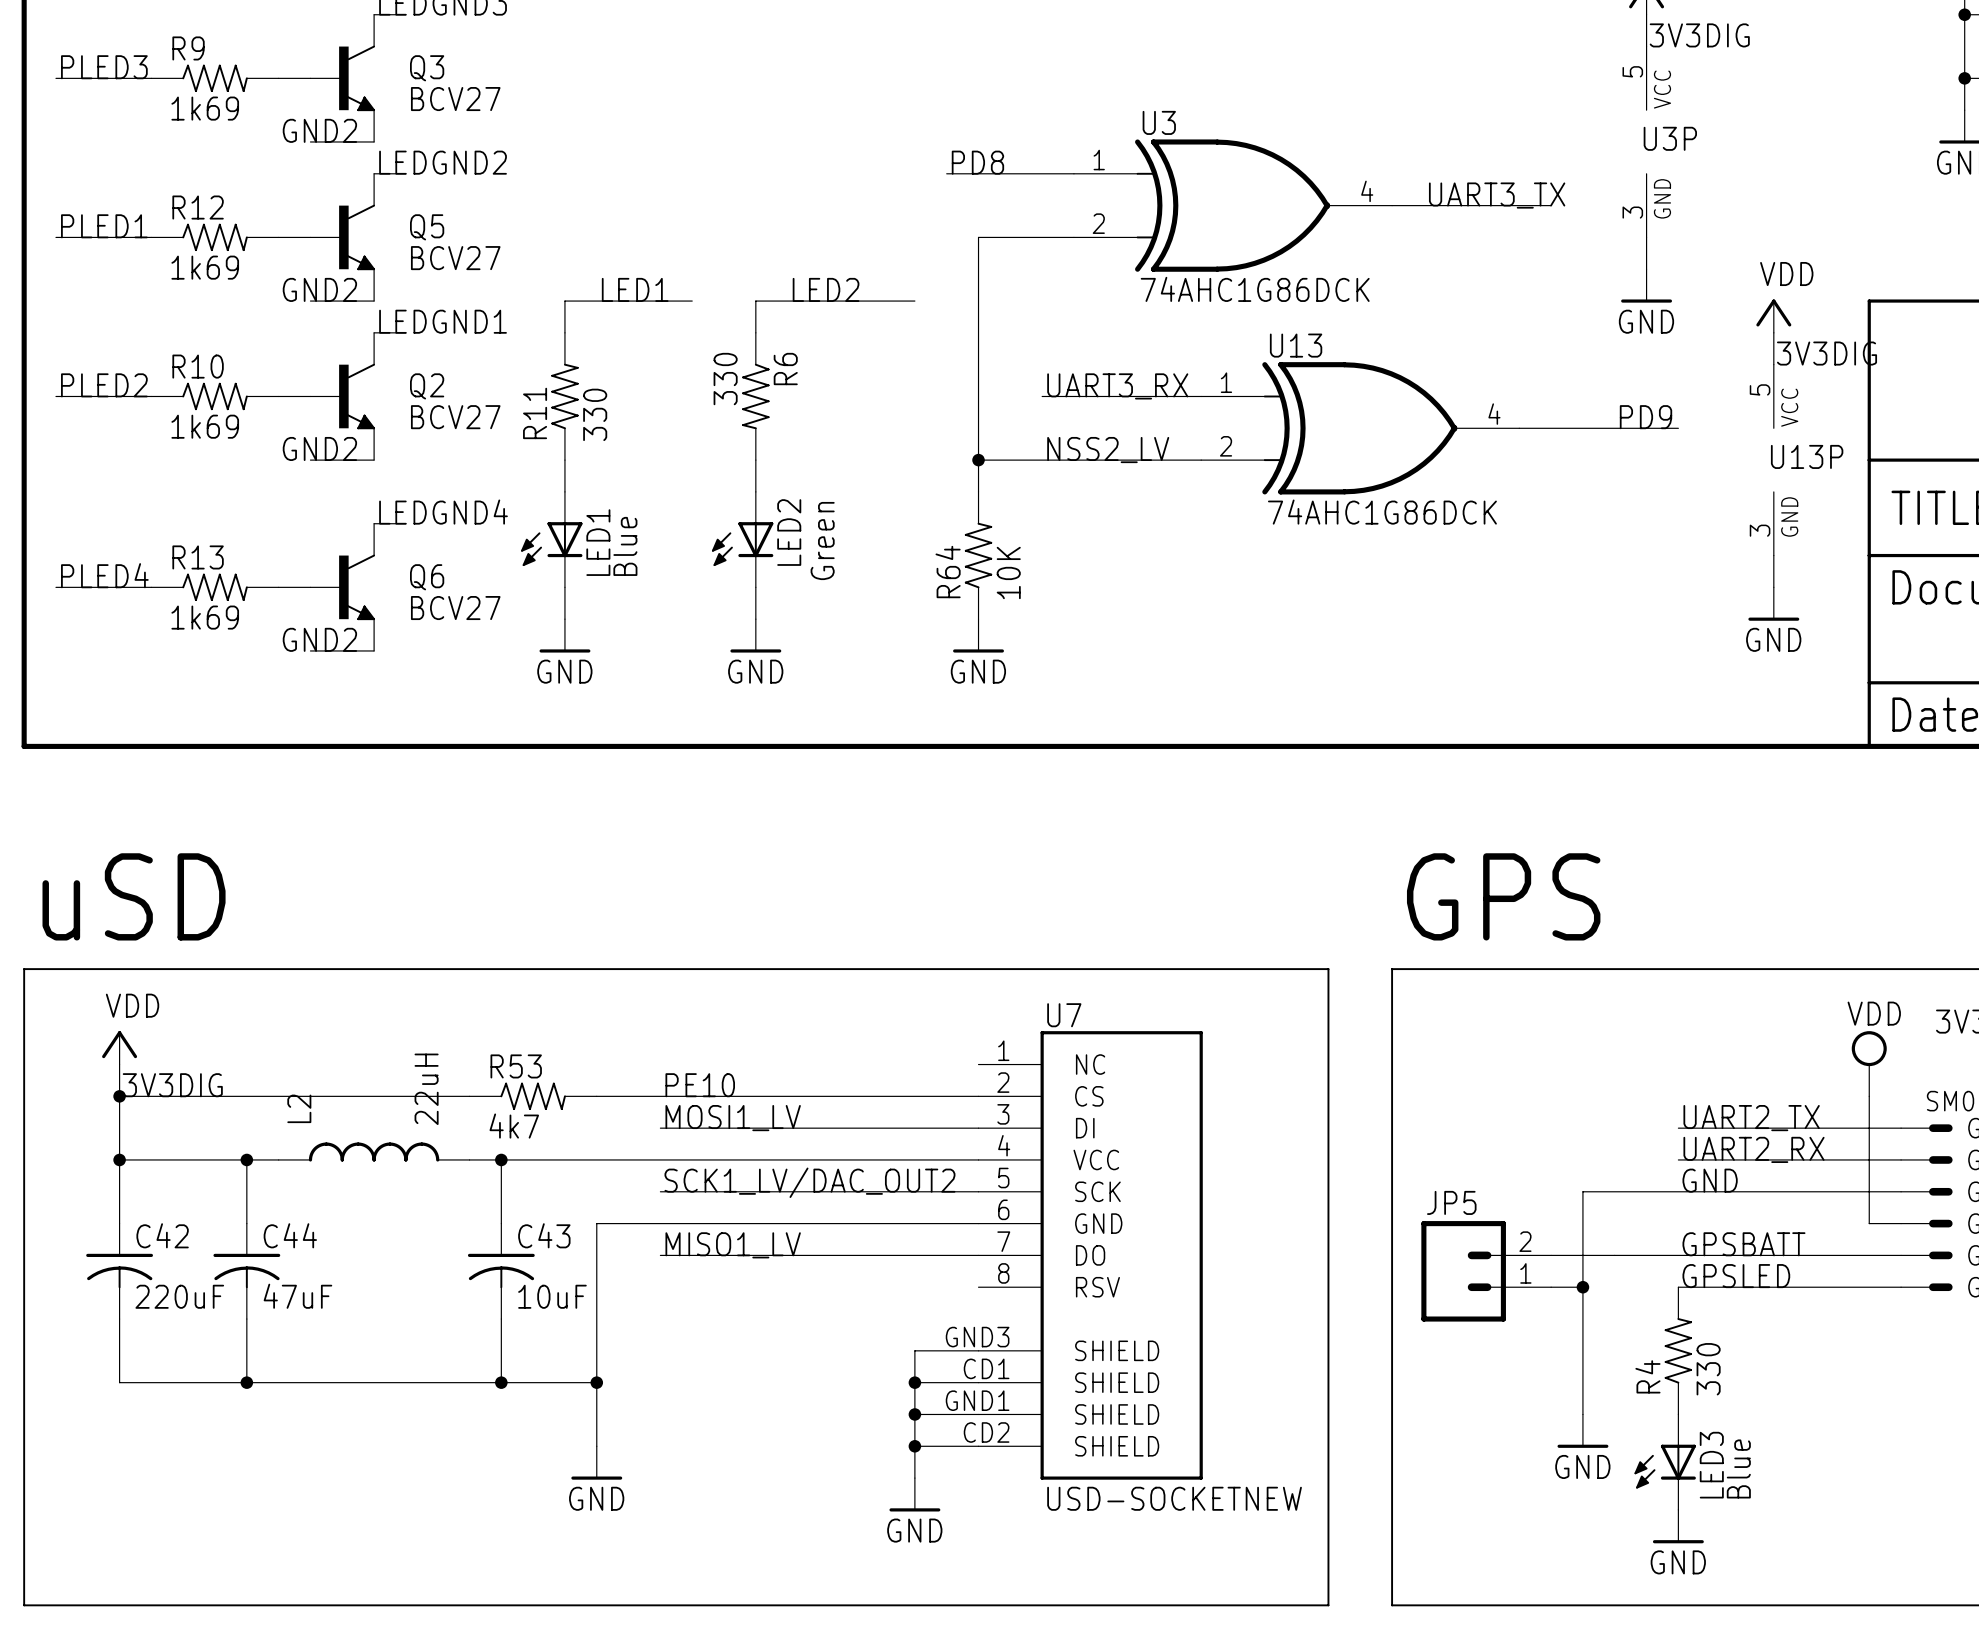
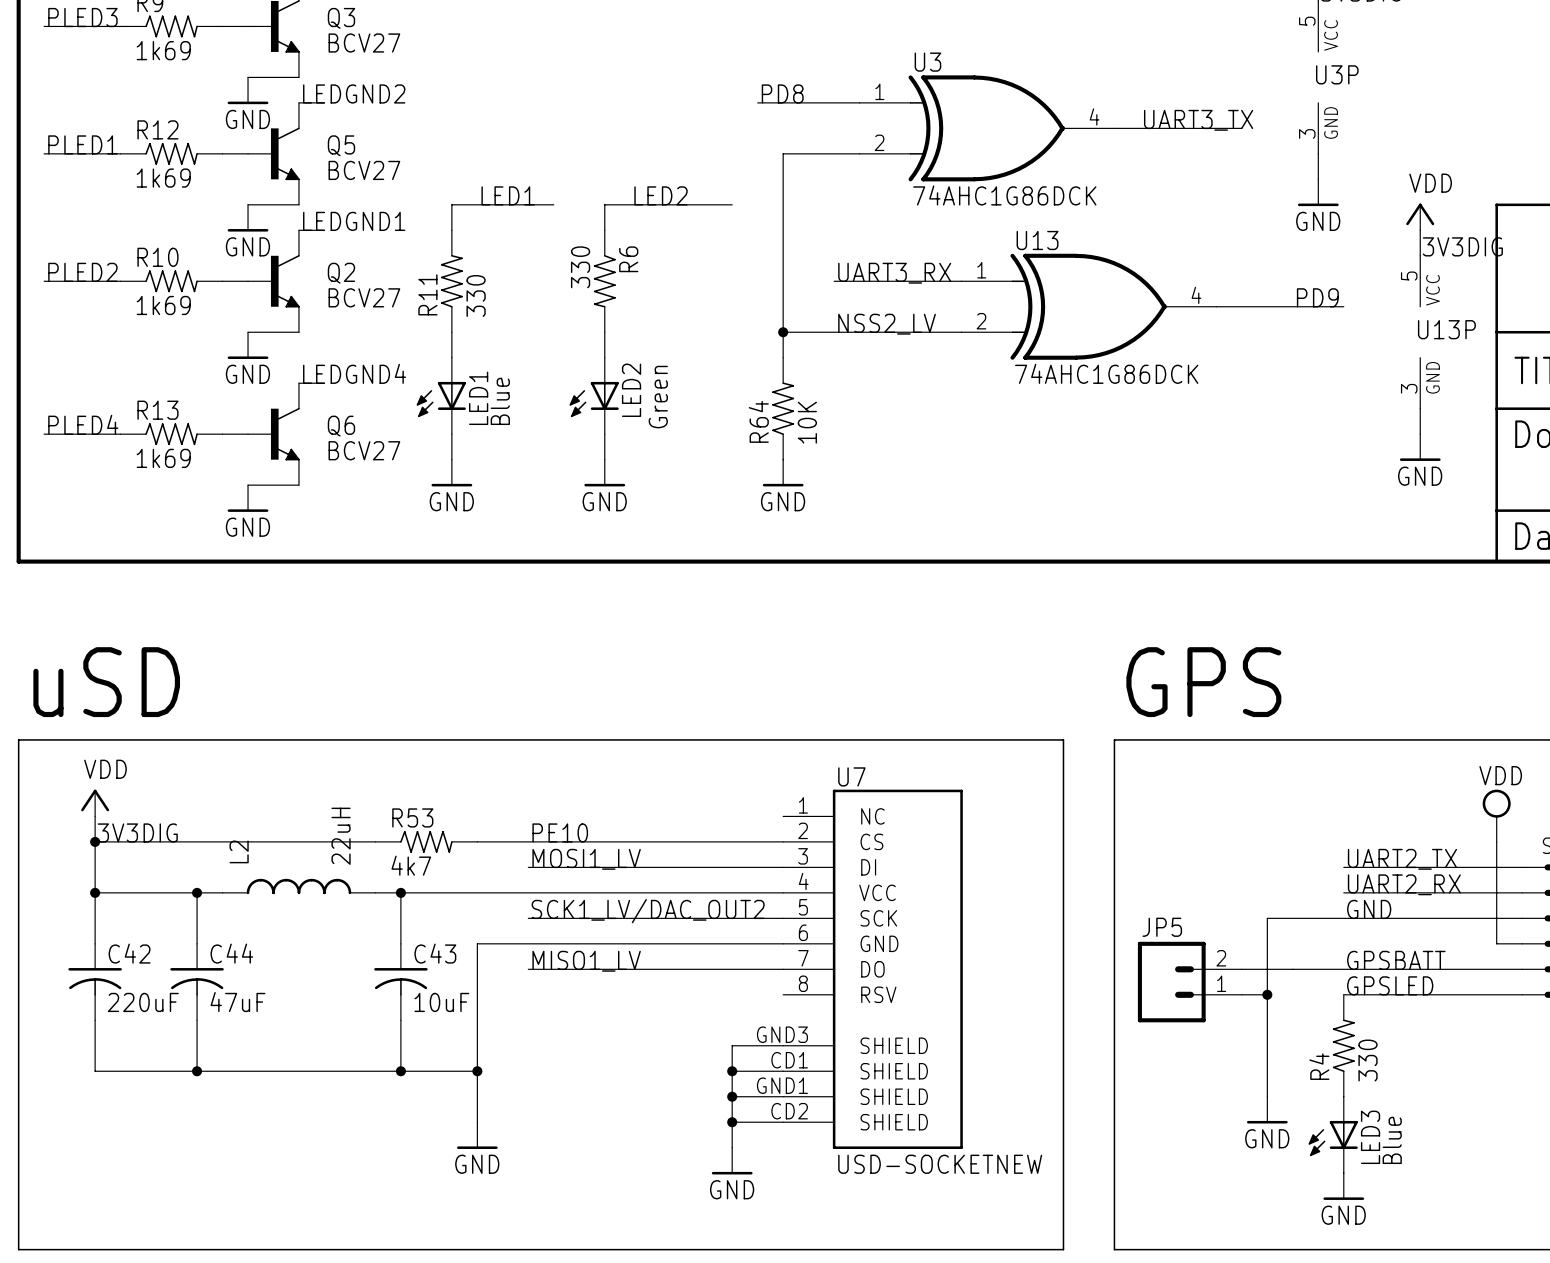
label: GND2 (319, 130) -> none
power symbol: none -> GND (248, 90)
label: GND2 (319, 289) -> none
power symbol: none -> GND (248, 218)
label: GND2 (319, 448) -> none
power symbol: none -> GND (248, 345)
label: GND2 (319, 639) -> none
power symbol: none -> GND (248, 498)

